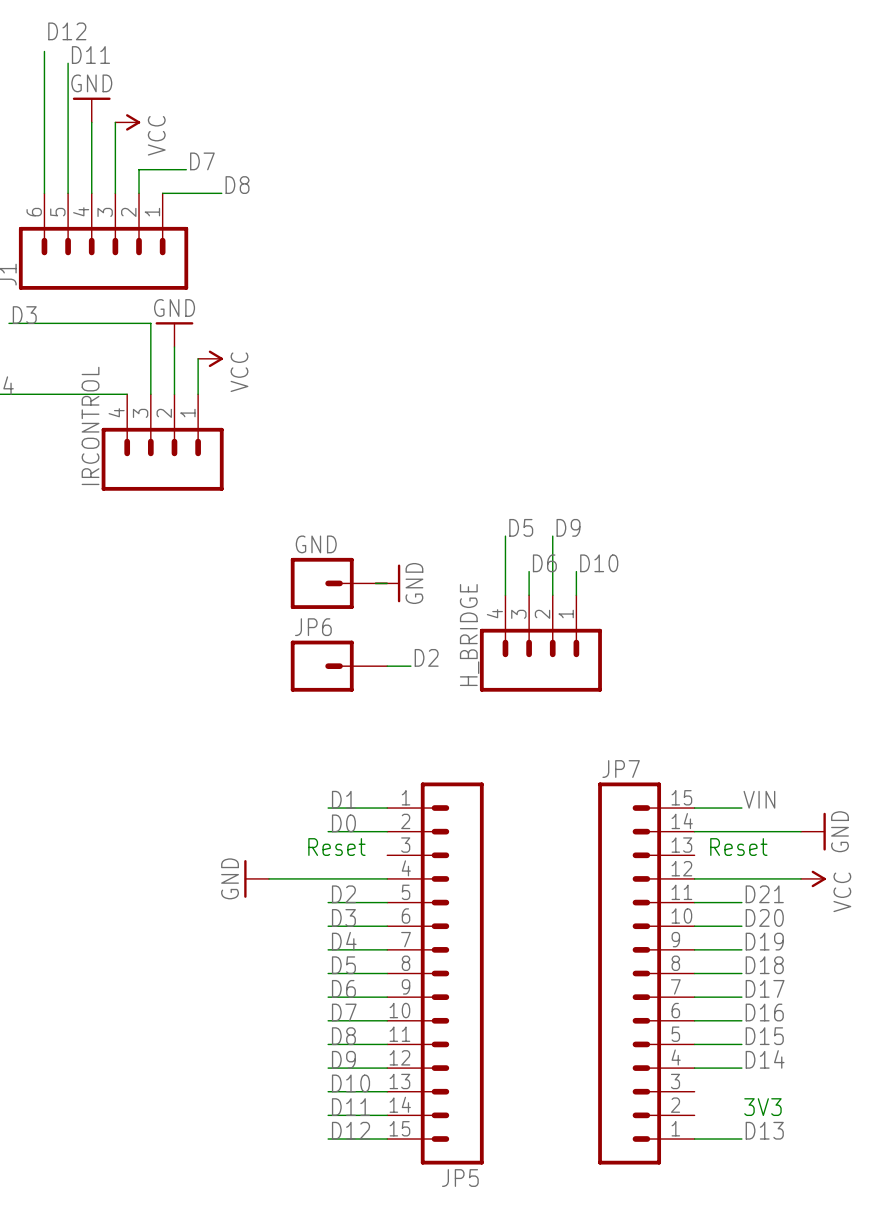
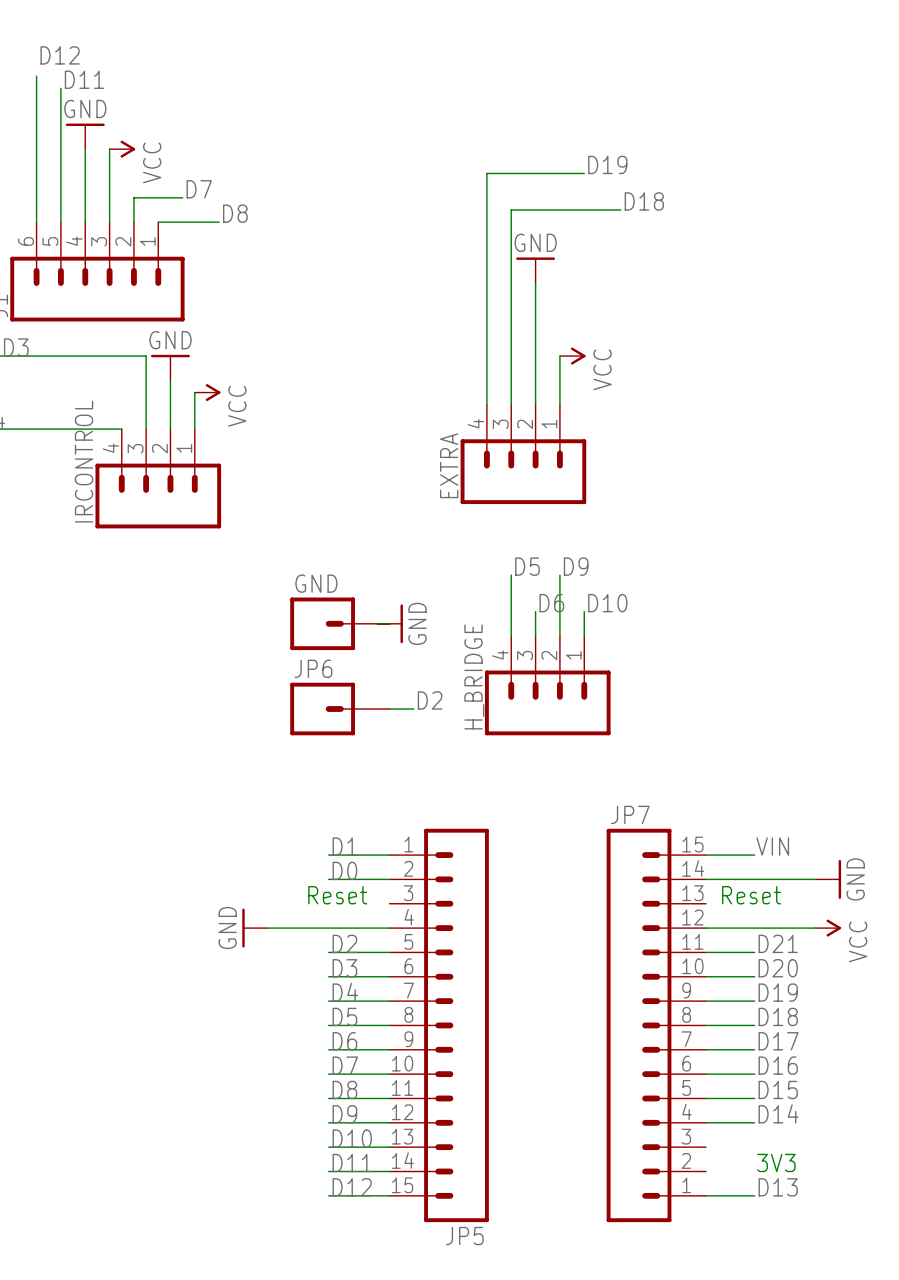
label: none -> D19 (607, 164)
wire: none -> (584, 173) (486, 173) (486, 404)
label: none -> D18 (644, 201)
wire: none -> (620, 209) (511, 209) (511, 404)
power symbol: none -> GND (535, 270)
wire: none -> (535, 283) (535, 404)
wire: none -> (559, 356) (559, 404)
power symbol: none -> VCC (572, 356)
EXTRA: none -> (523, 454)

